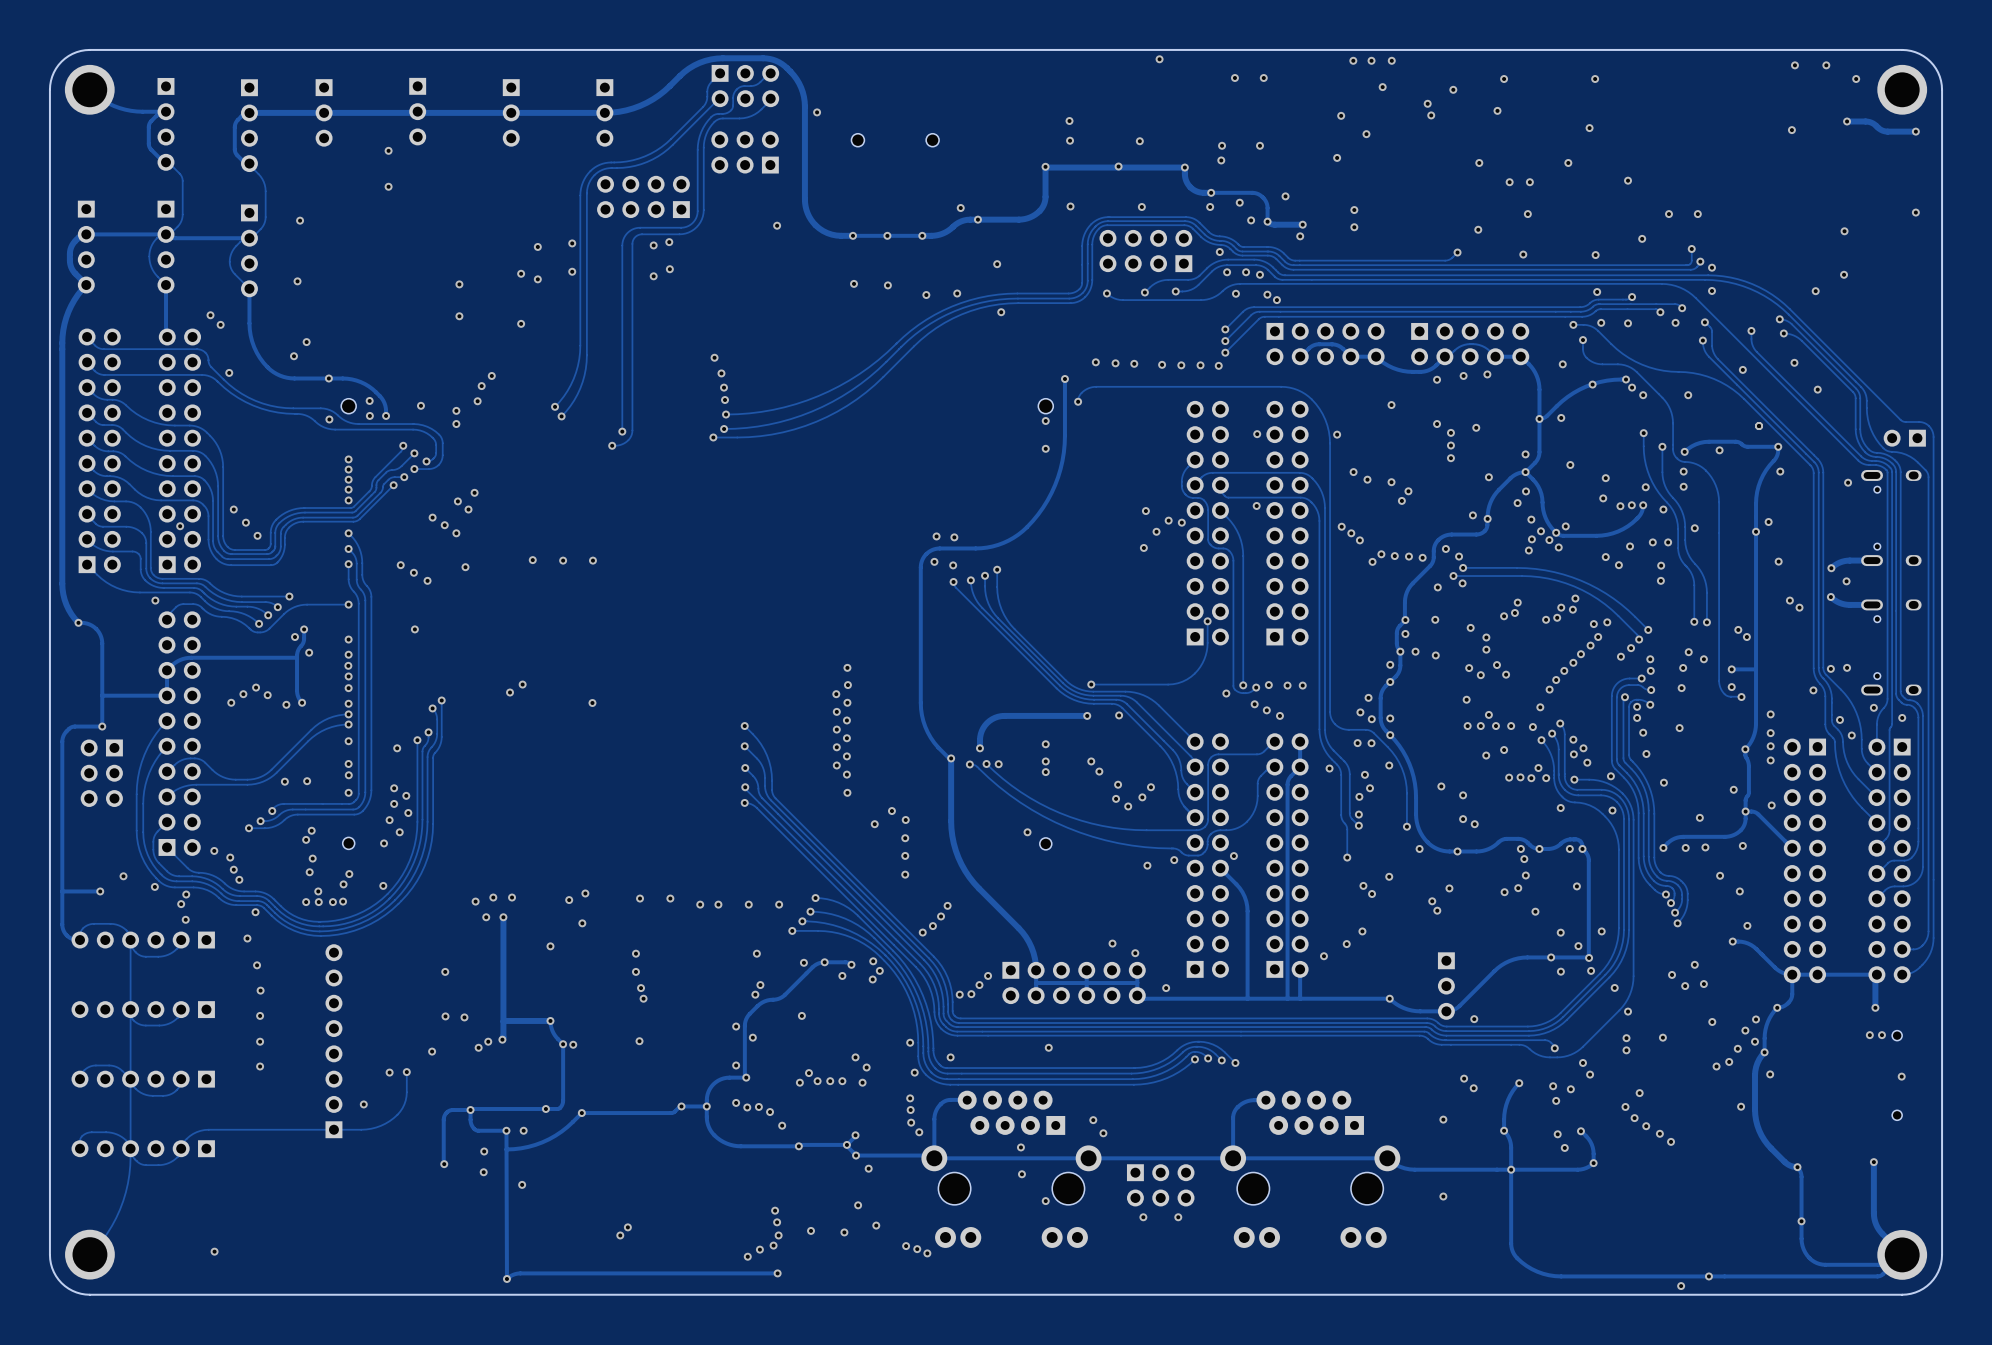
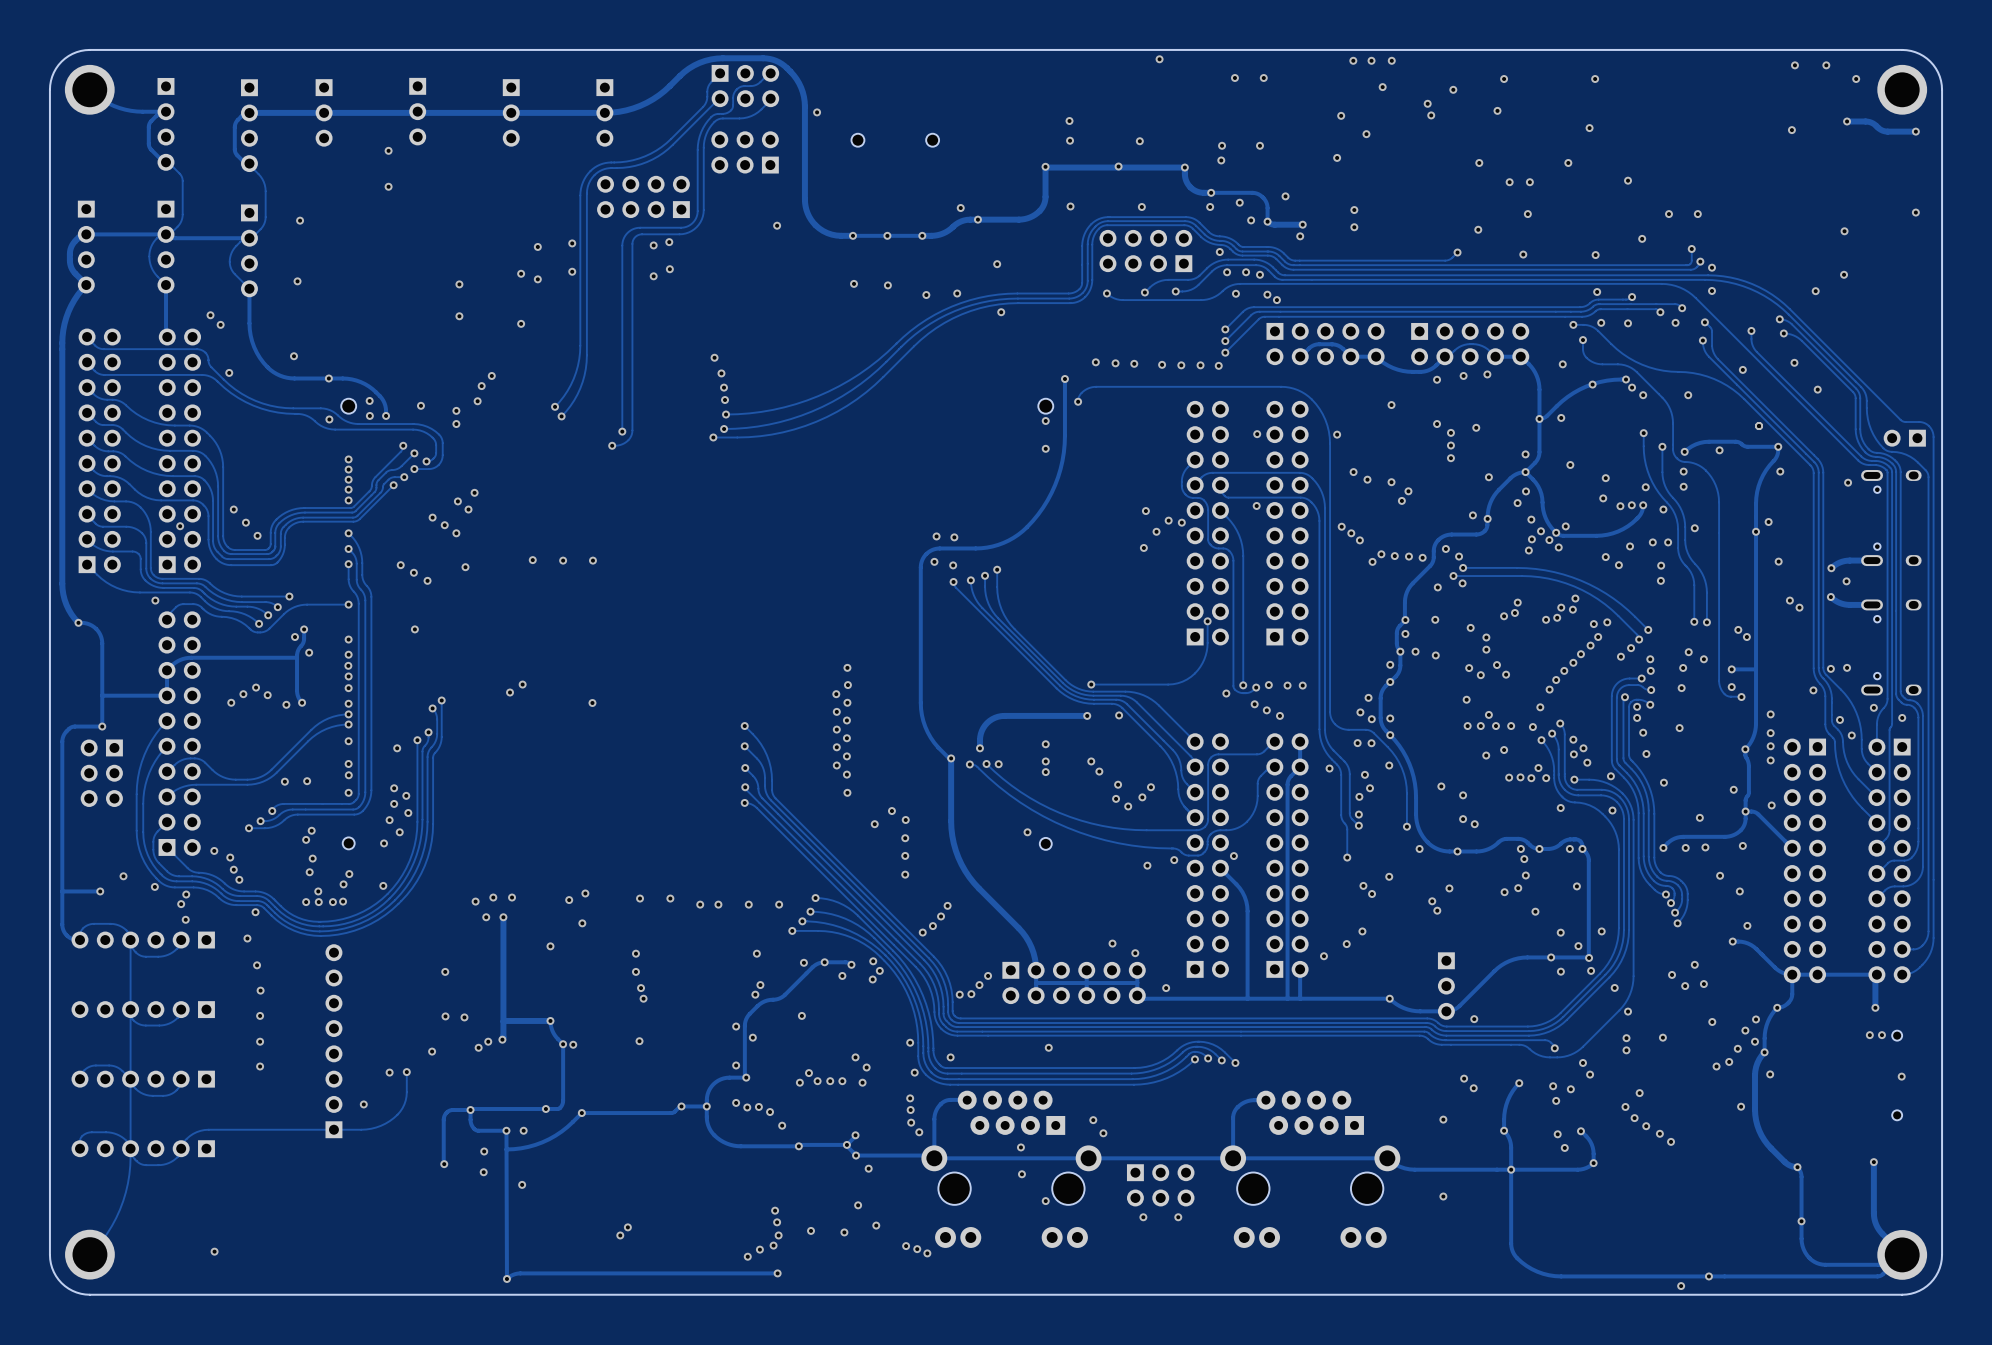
via: (306, 342) -> none

